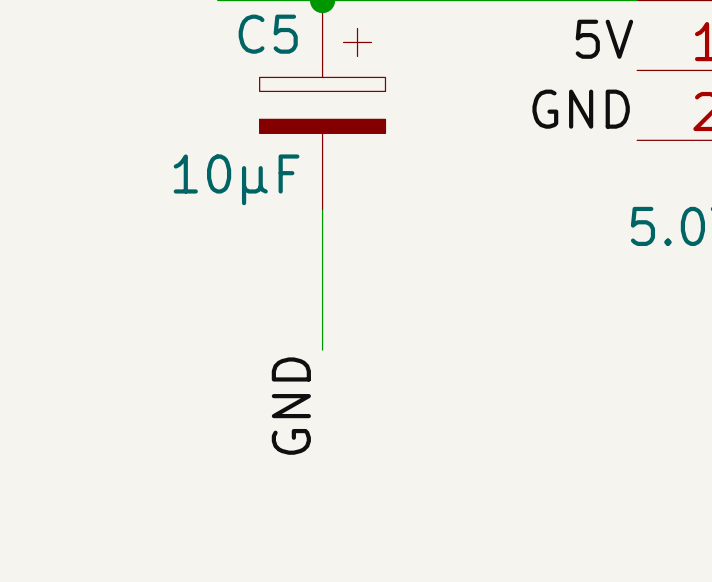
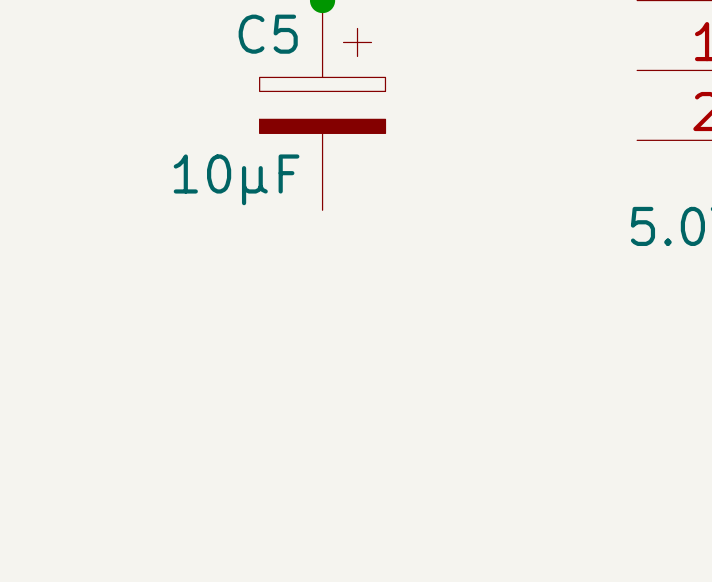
wire: (217, 0) (637, 0) -> none
label: 5V (604, 39) -> none
label: GND (581, 109) -> none
wire: (322, 210) (322, 350) -> none
label: GND (291, 406) -> none

